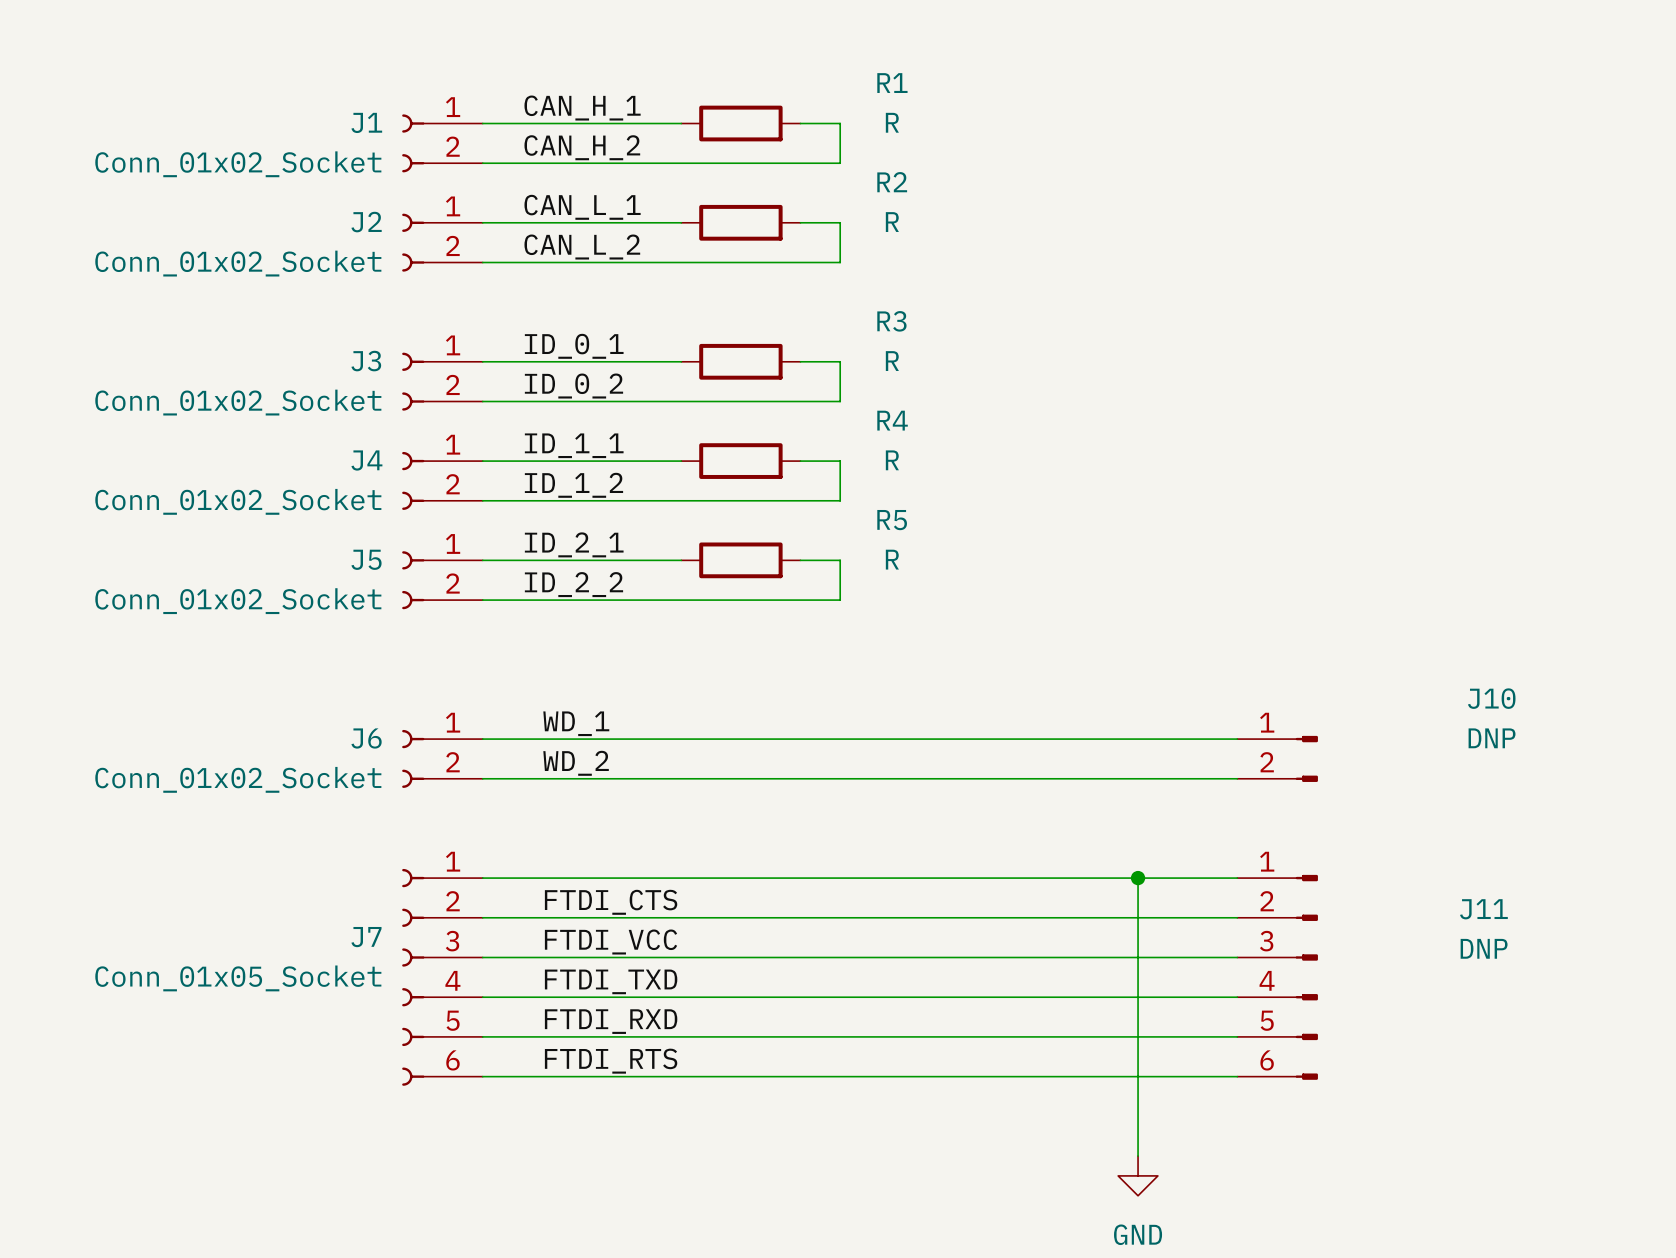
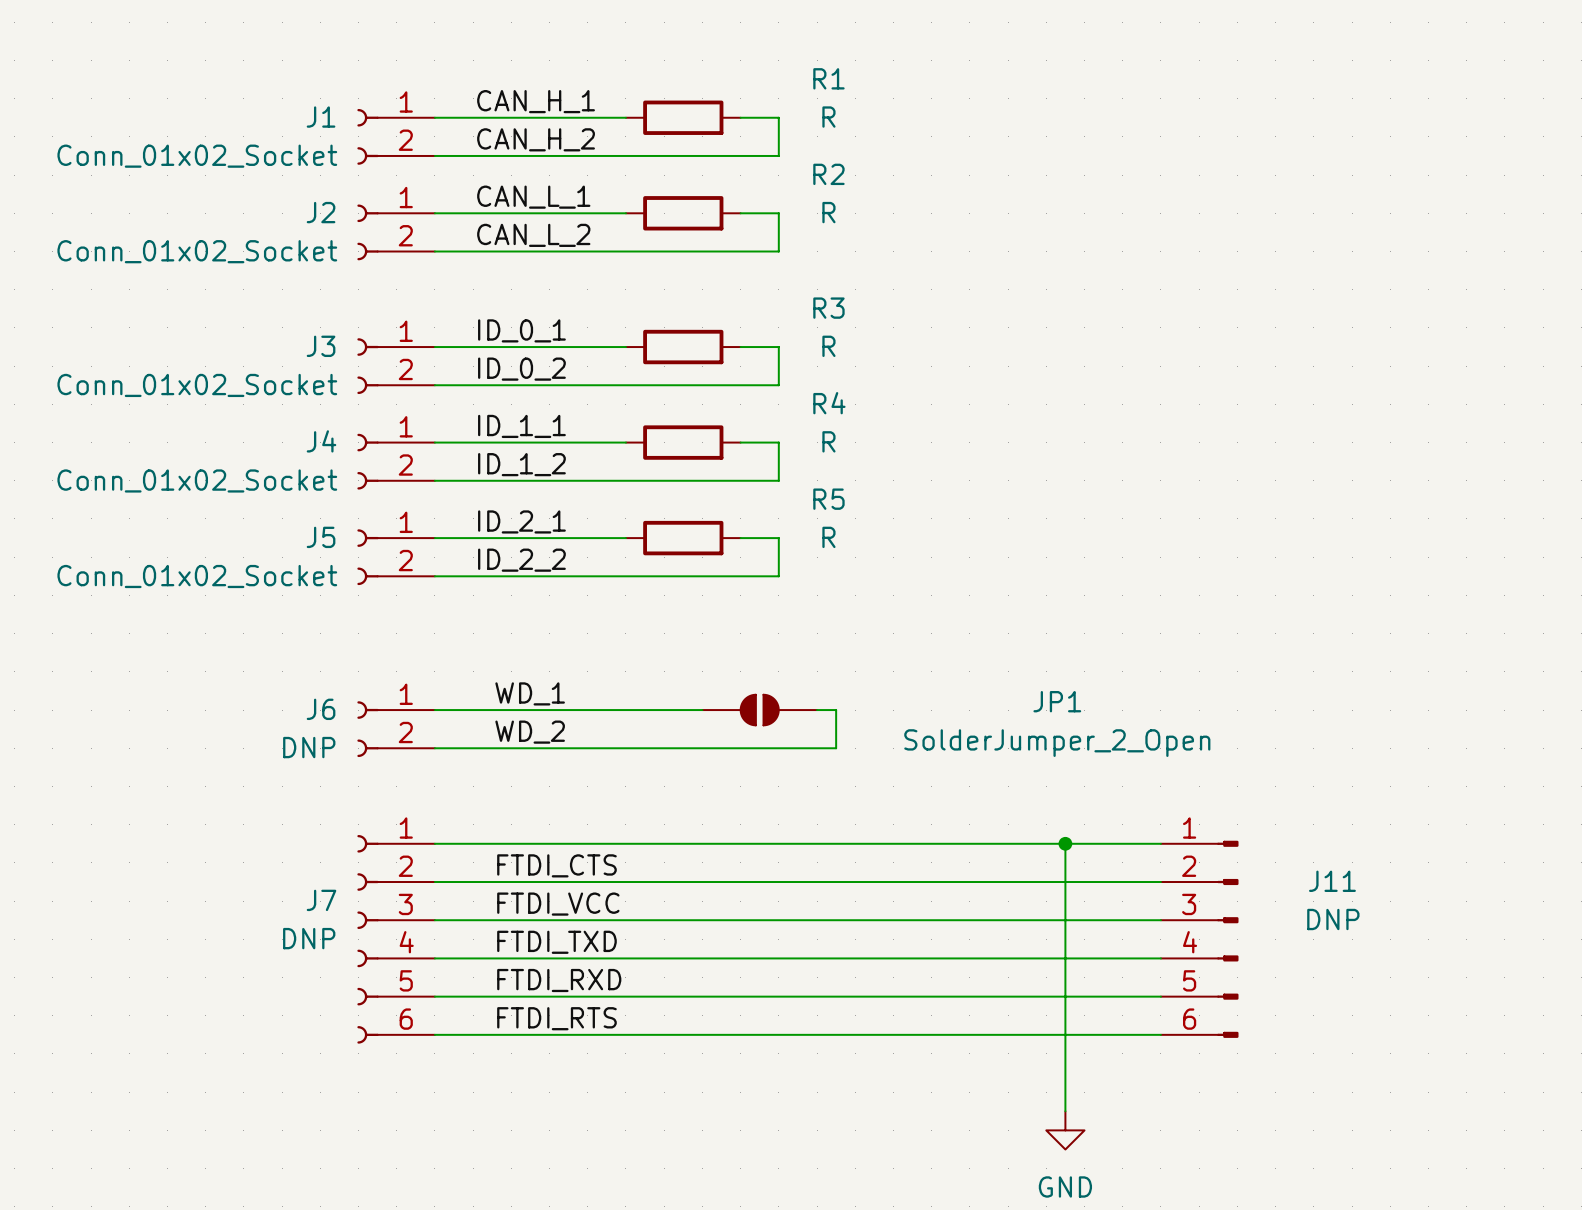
JP1: none -> SolderJumper_2_Open (759, 710)
wire: (899, 739) (1237, 739) -> (836, 710) (836, 748)
J10: DNP (1277, 758) -> none
wire: (899, 778) (1237, 778) -> none
J6 value: Conn_01x02_Socket (238, 779) -> DNP (309, 747)
J11 name position: J11 (1483, 909) -> J11 (1332, 881)
J11 value position: DNP (1484, 948) -> DNP (1333, 919)
J7 value: Conn_01x05_Socket (238, 978) -> DNP (309, 938)

